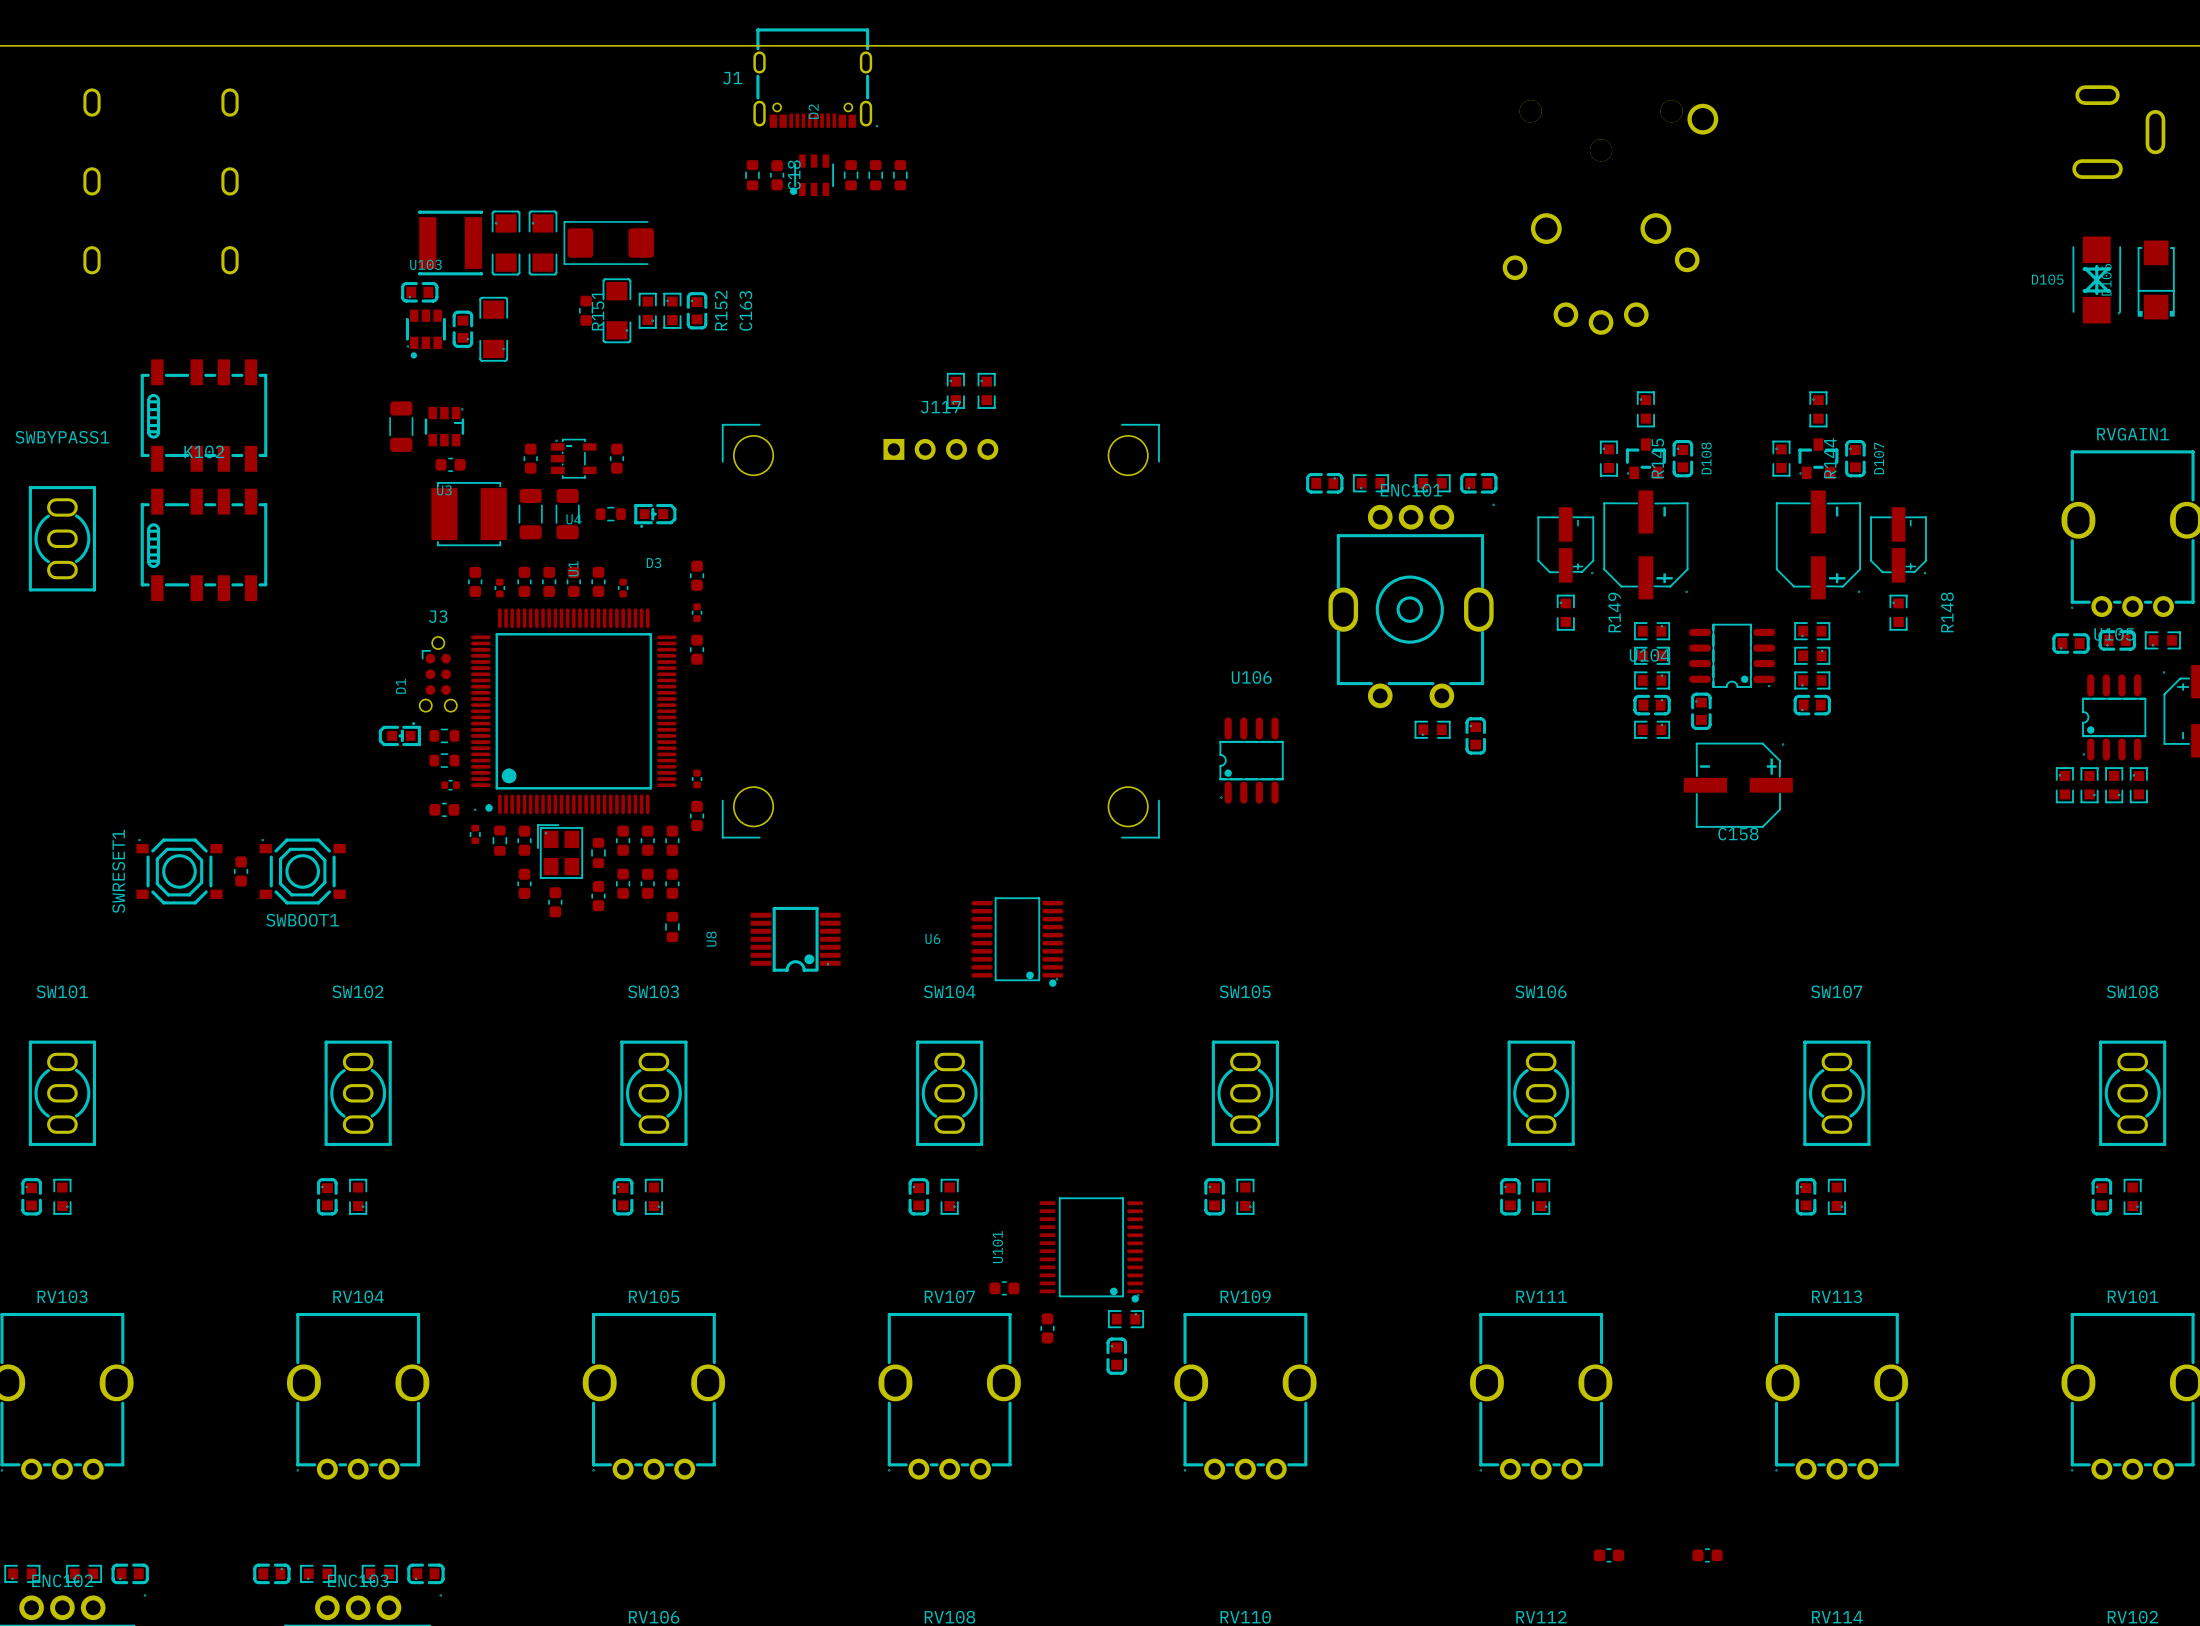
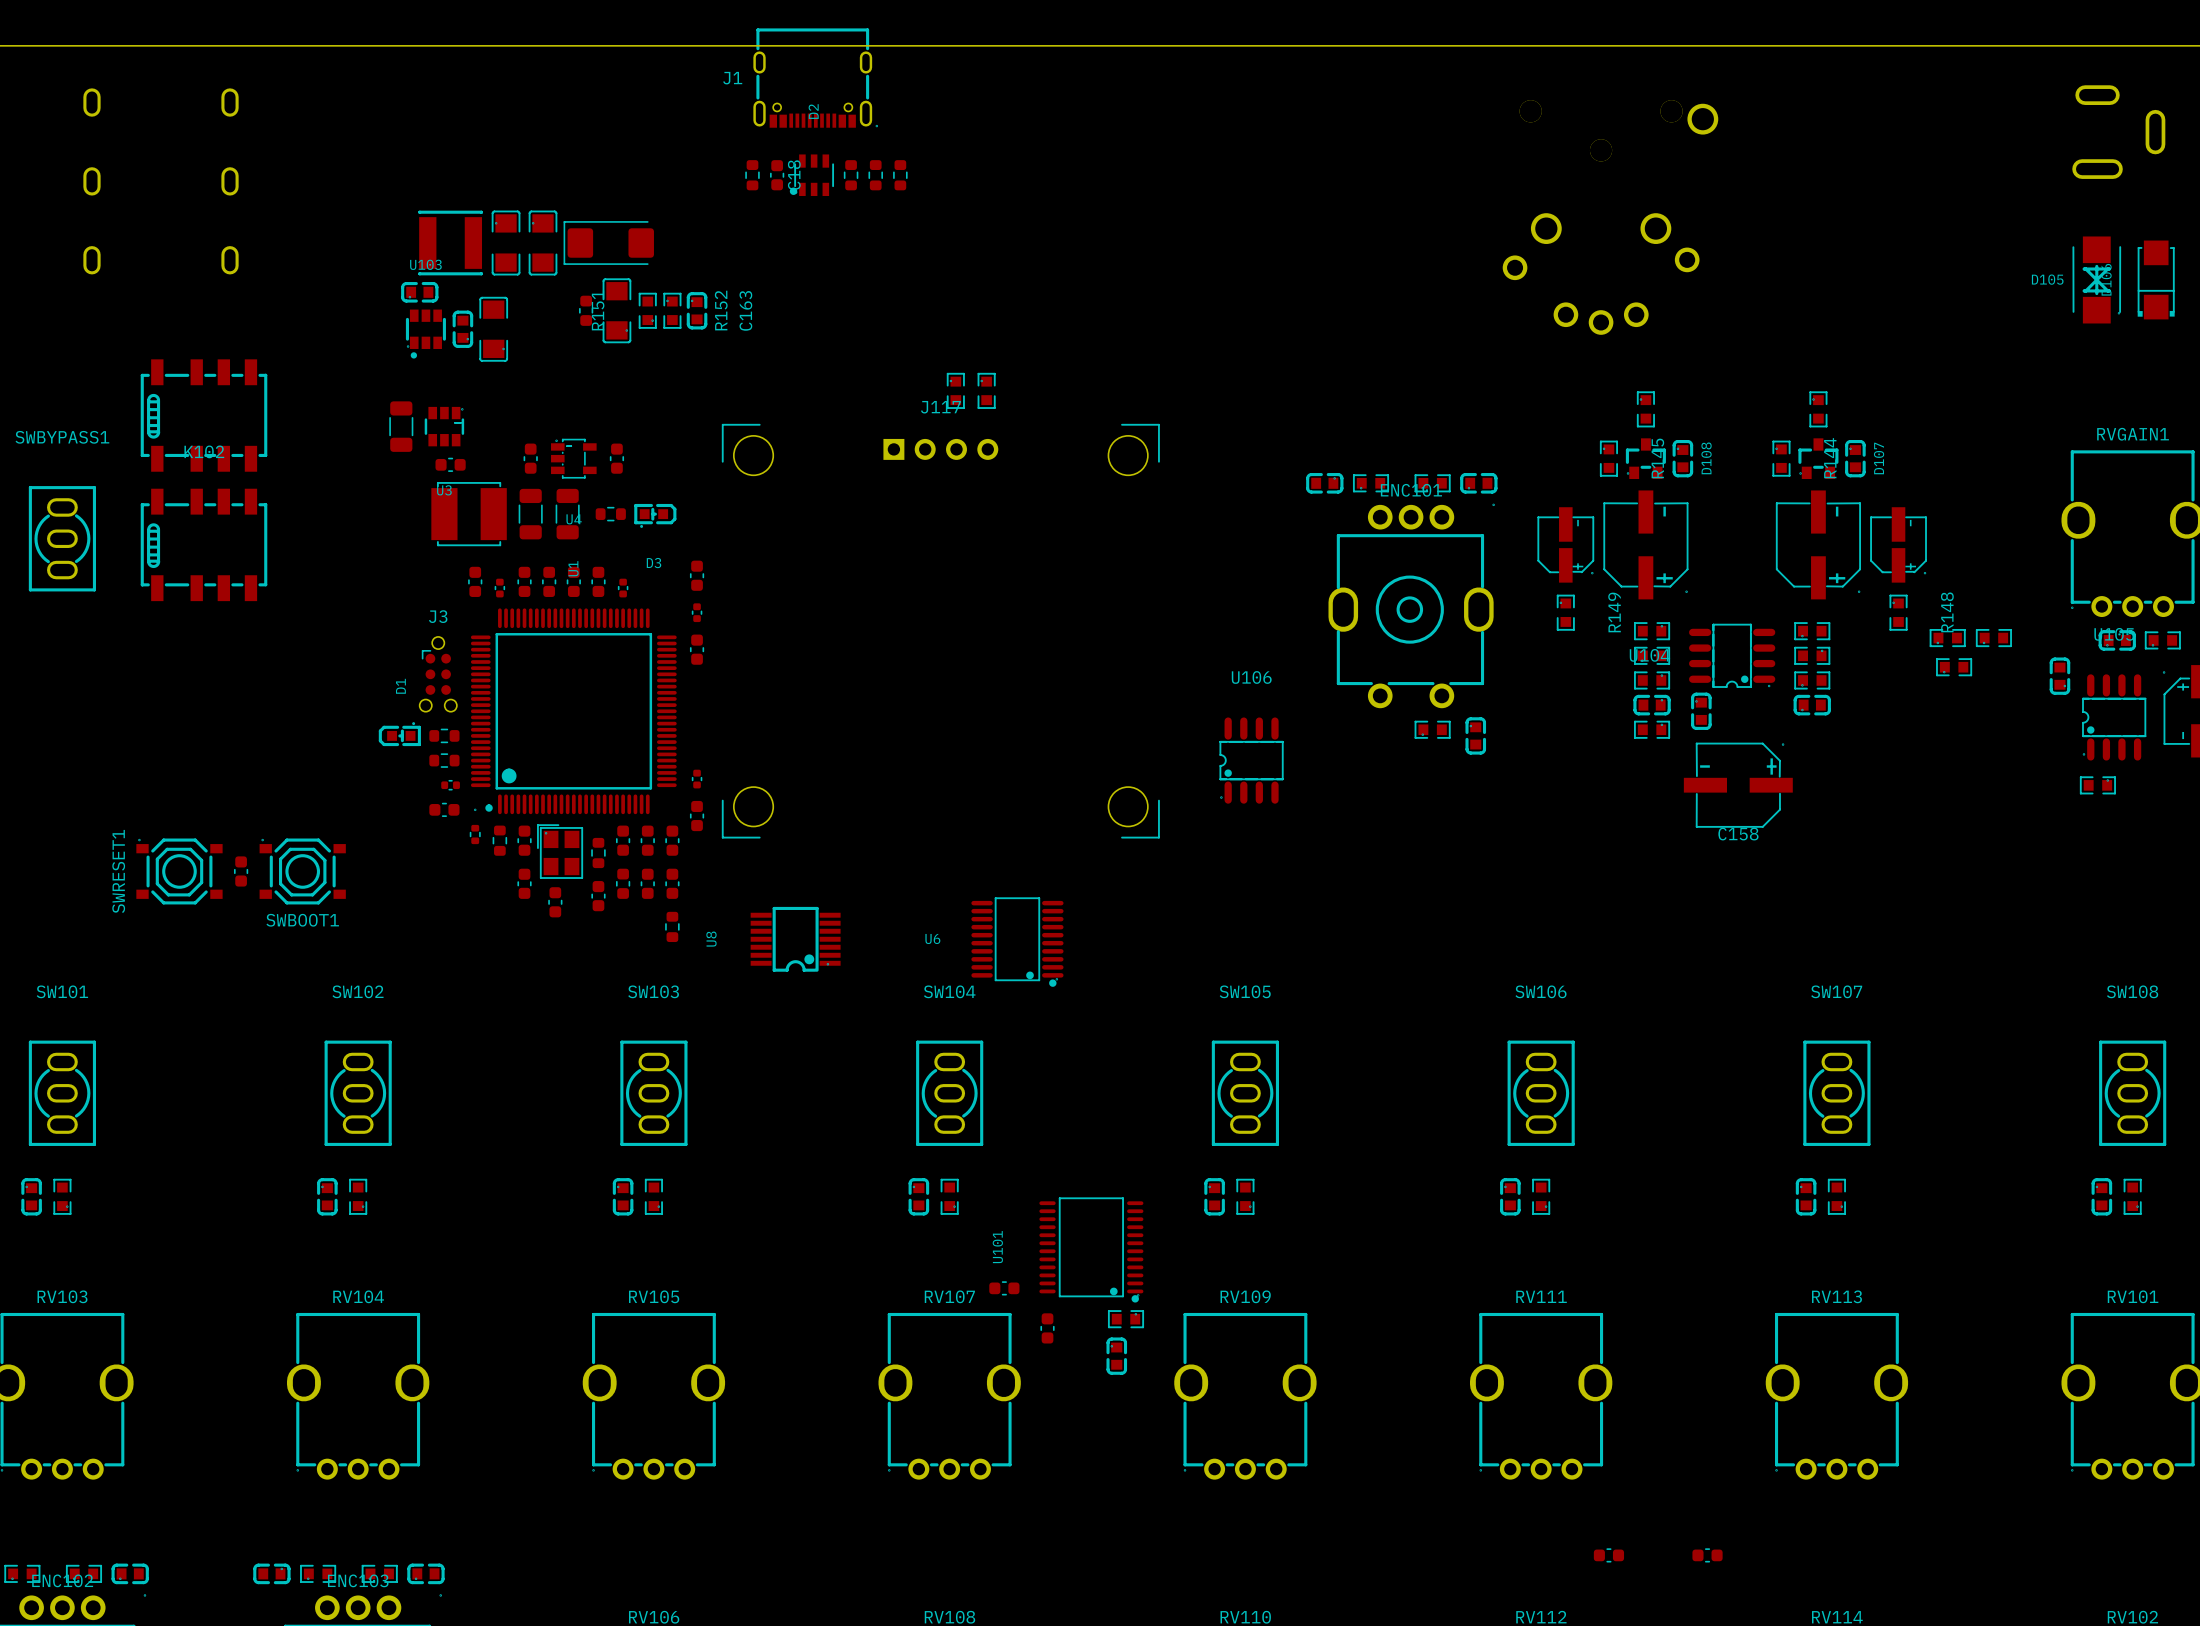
part: none -> (1947, 638)
part: none -> (1993, 638)
part rotation: 0° (2071, 643) -> 90° counterclockwise (2059, 676)
part position: (2071, 643) -> (2059, 676)
part: none -> (1954, 667)
part: (2064, 785) -> none
part: (2089, 785) -> none
part: none -> (2097, 785)
part: (2114, 785) -> none
part: (2138, 785) -> none

